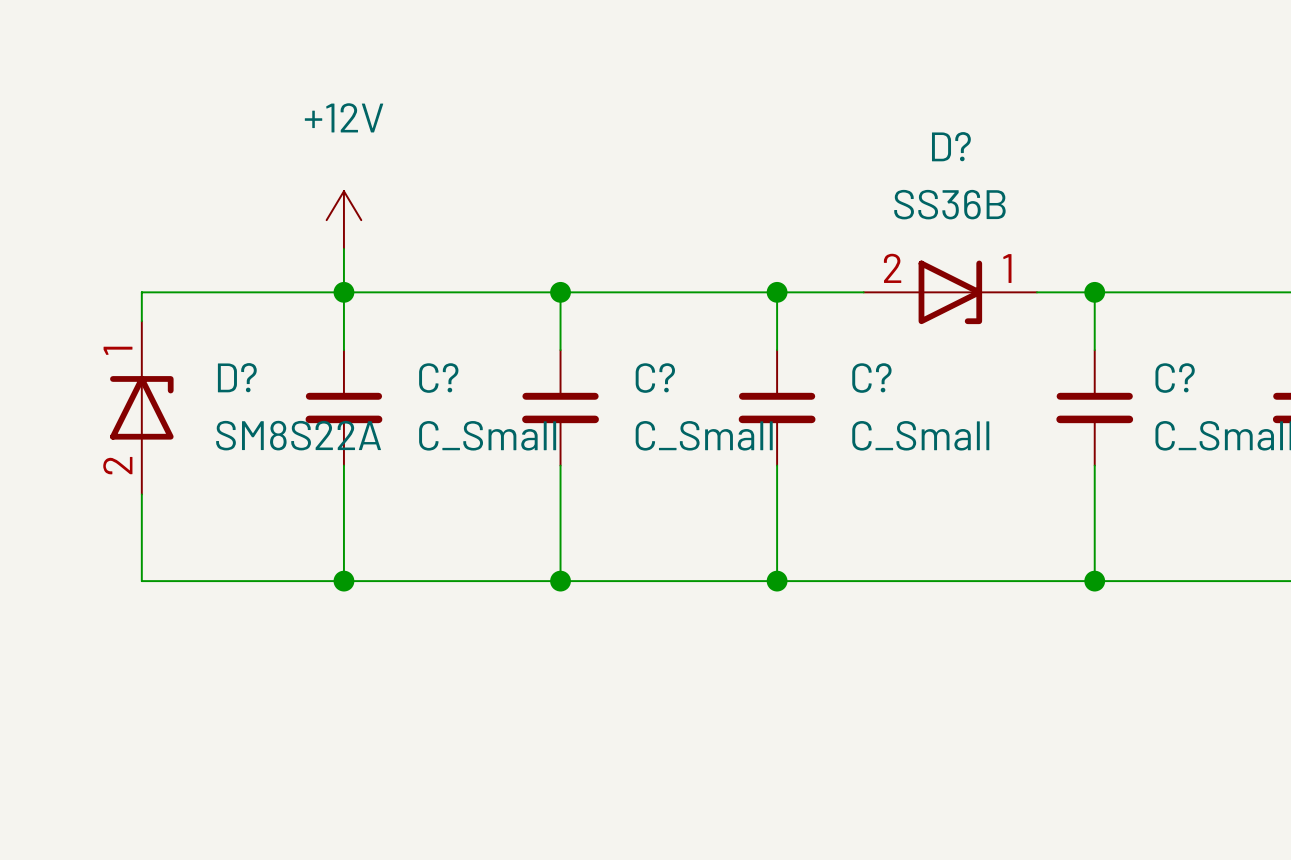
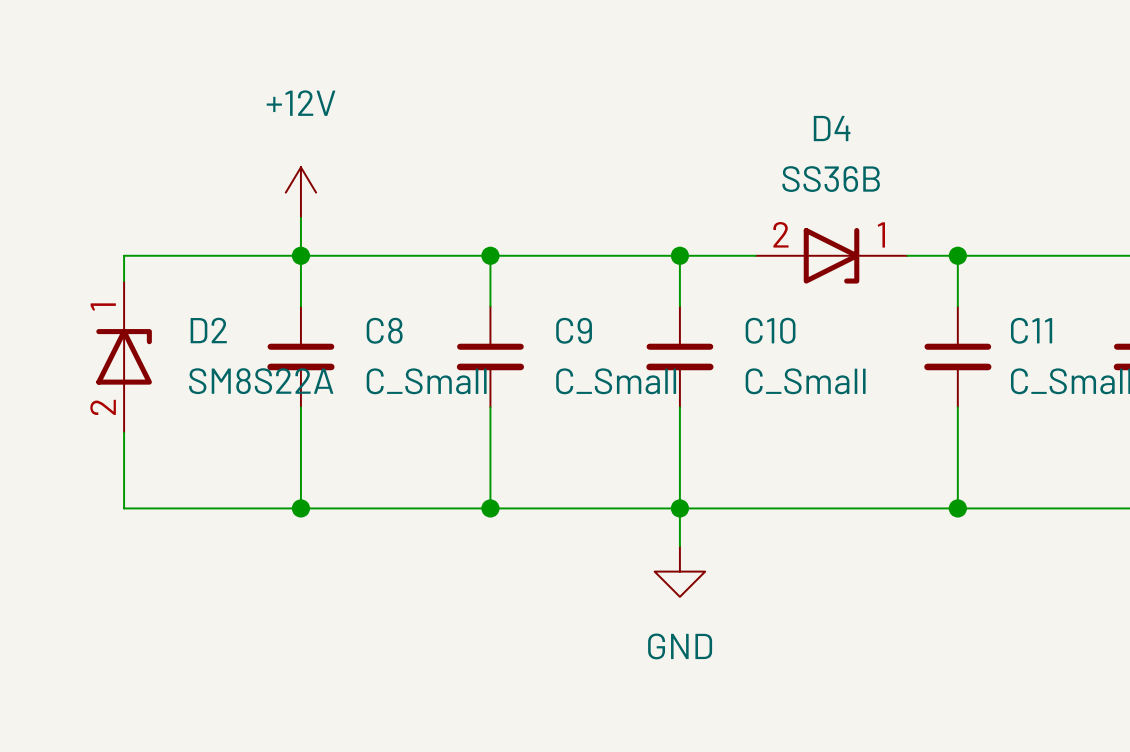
D? name: D? (951, 146) -> D4 (832, 128)
D? name: D? (237, 377) -> D2 (208, 330)
C? name: C? (438, 378) -> C8 (384, 330)
C? name: C? (655, 378) -> C9 (574, 330)
C? name: C? (871, 378) -> C10 (770, 330)
C? name: C? (1175, 378) -> C11 (1031, 330)
wire: none -> (679, 508) (679, 546)
power symbol: none -> GND (679, 571)

